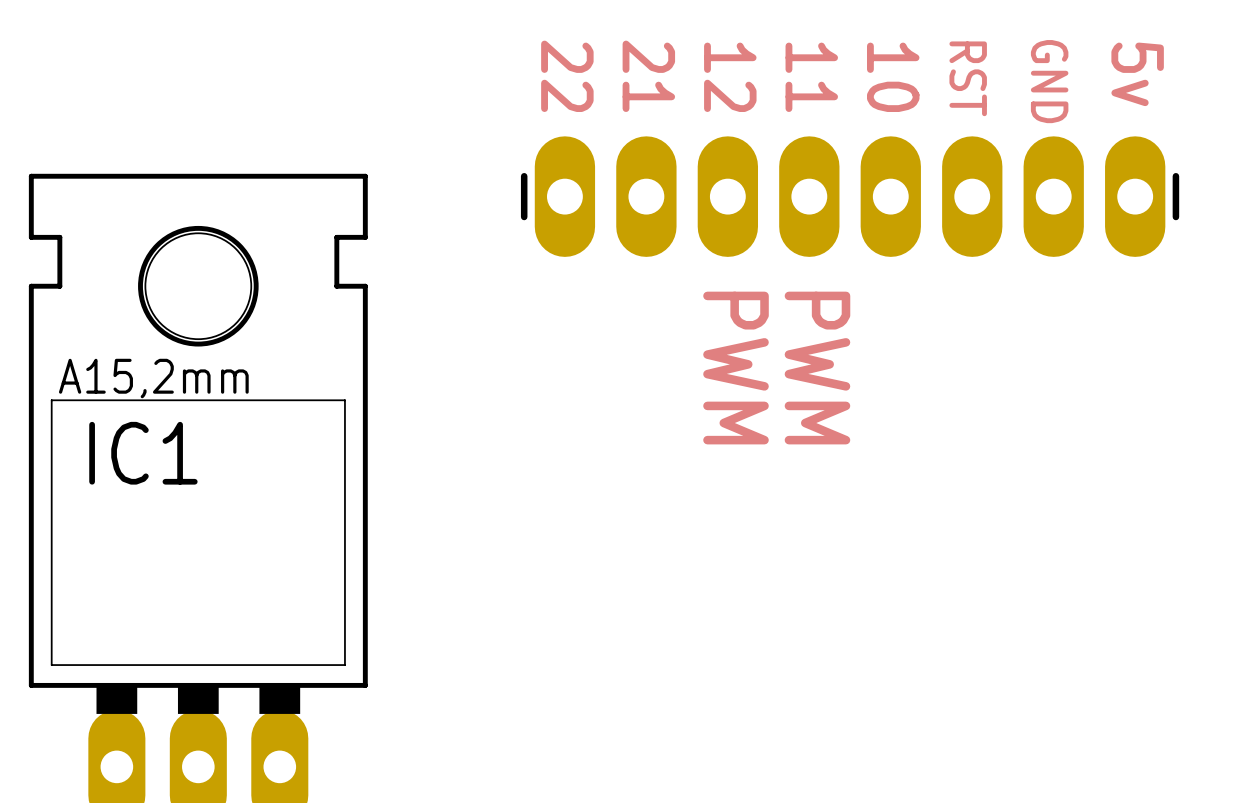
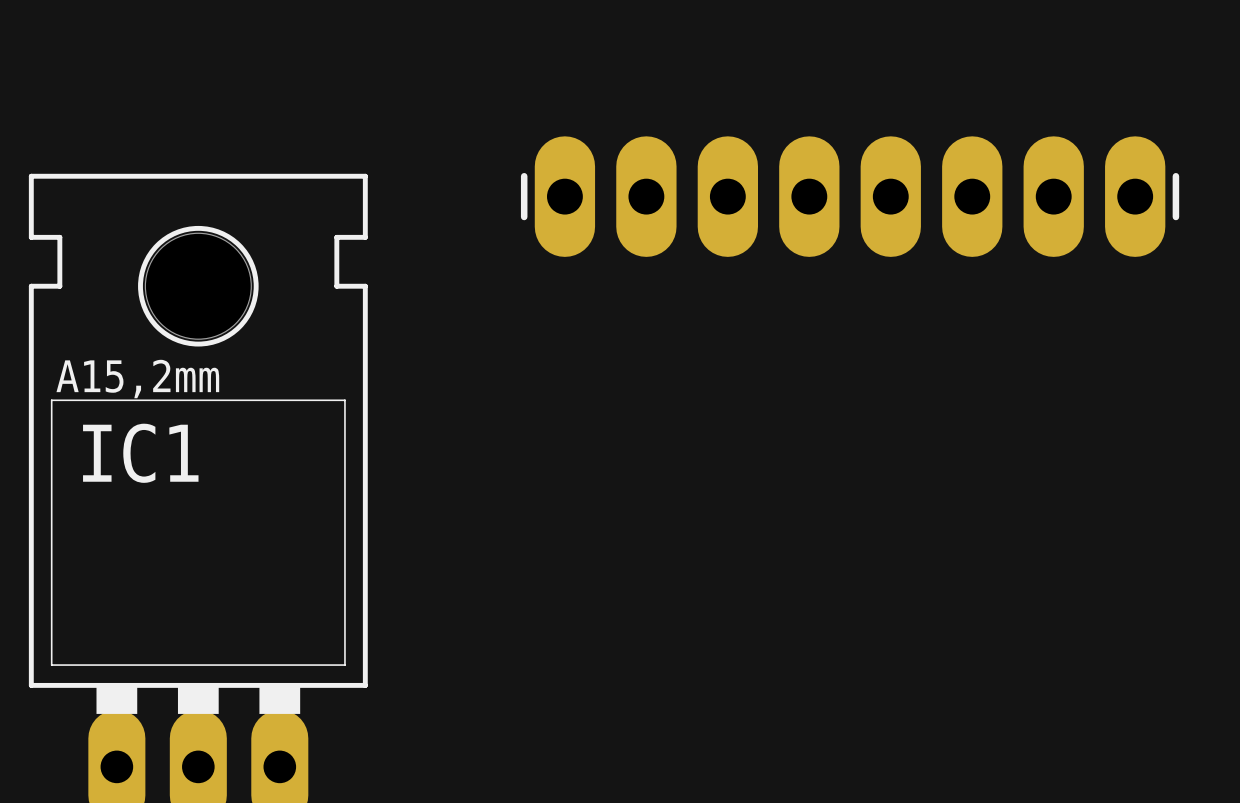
text: 5v (1137, 74) -> none
text: 22 (567, 76) -> none
text: 21 (648, 76) -> none
text: 12 (730, 77) -> none
text: 11 (811, 77) -> none
text: 10 (893, 77) -> none
text: RST (968, 78) -> none
text: GND (1049, 81) -> none
text: PWM (736, 368) -> none
text: PWM (817, 368) -> none

